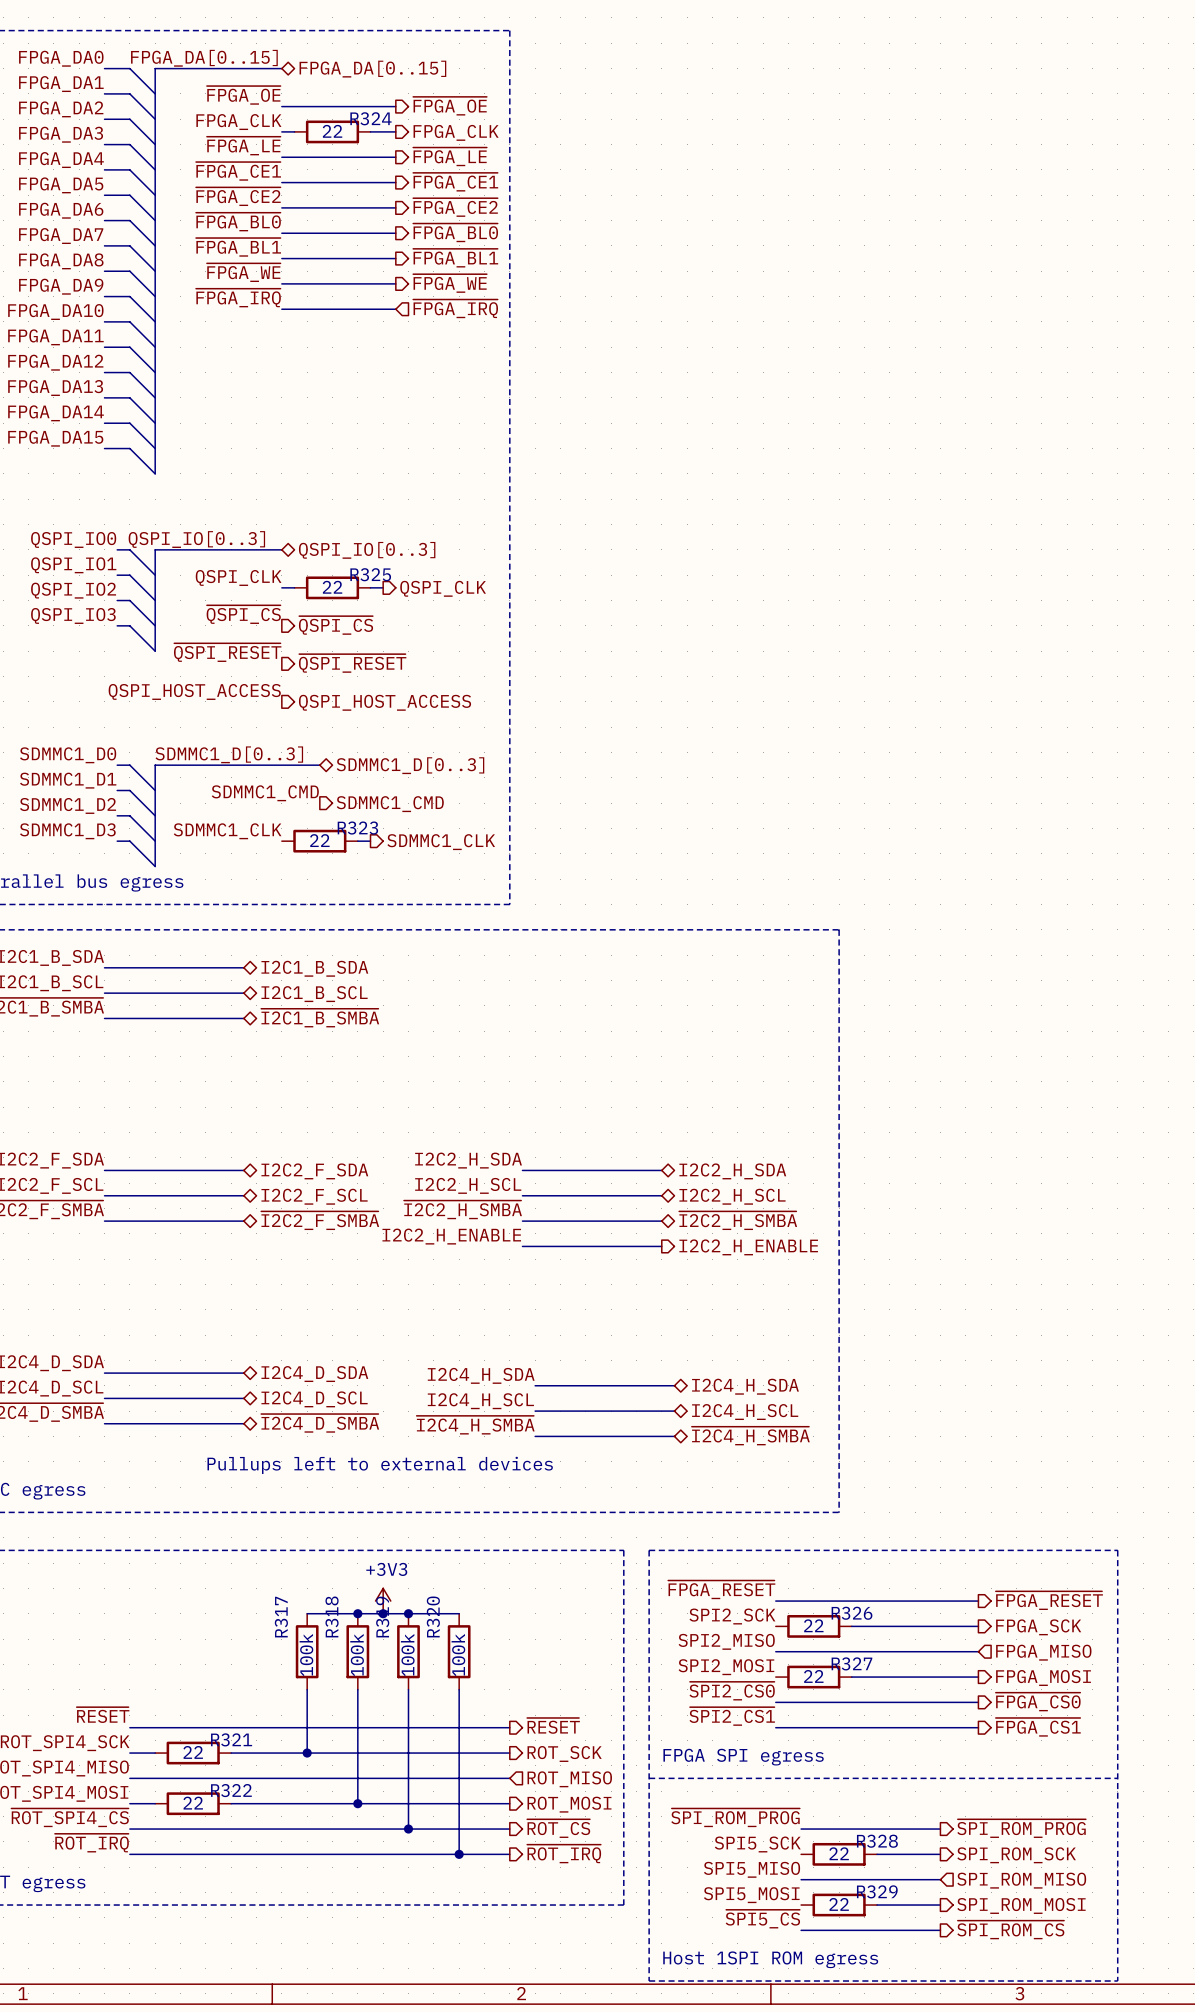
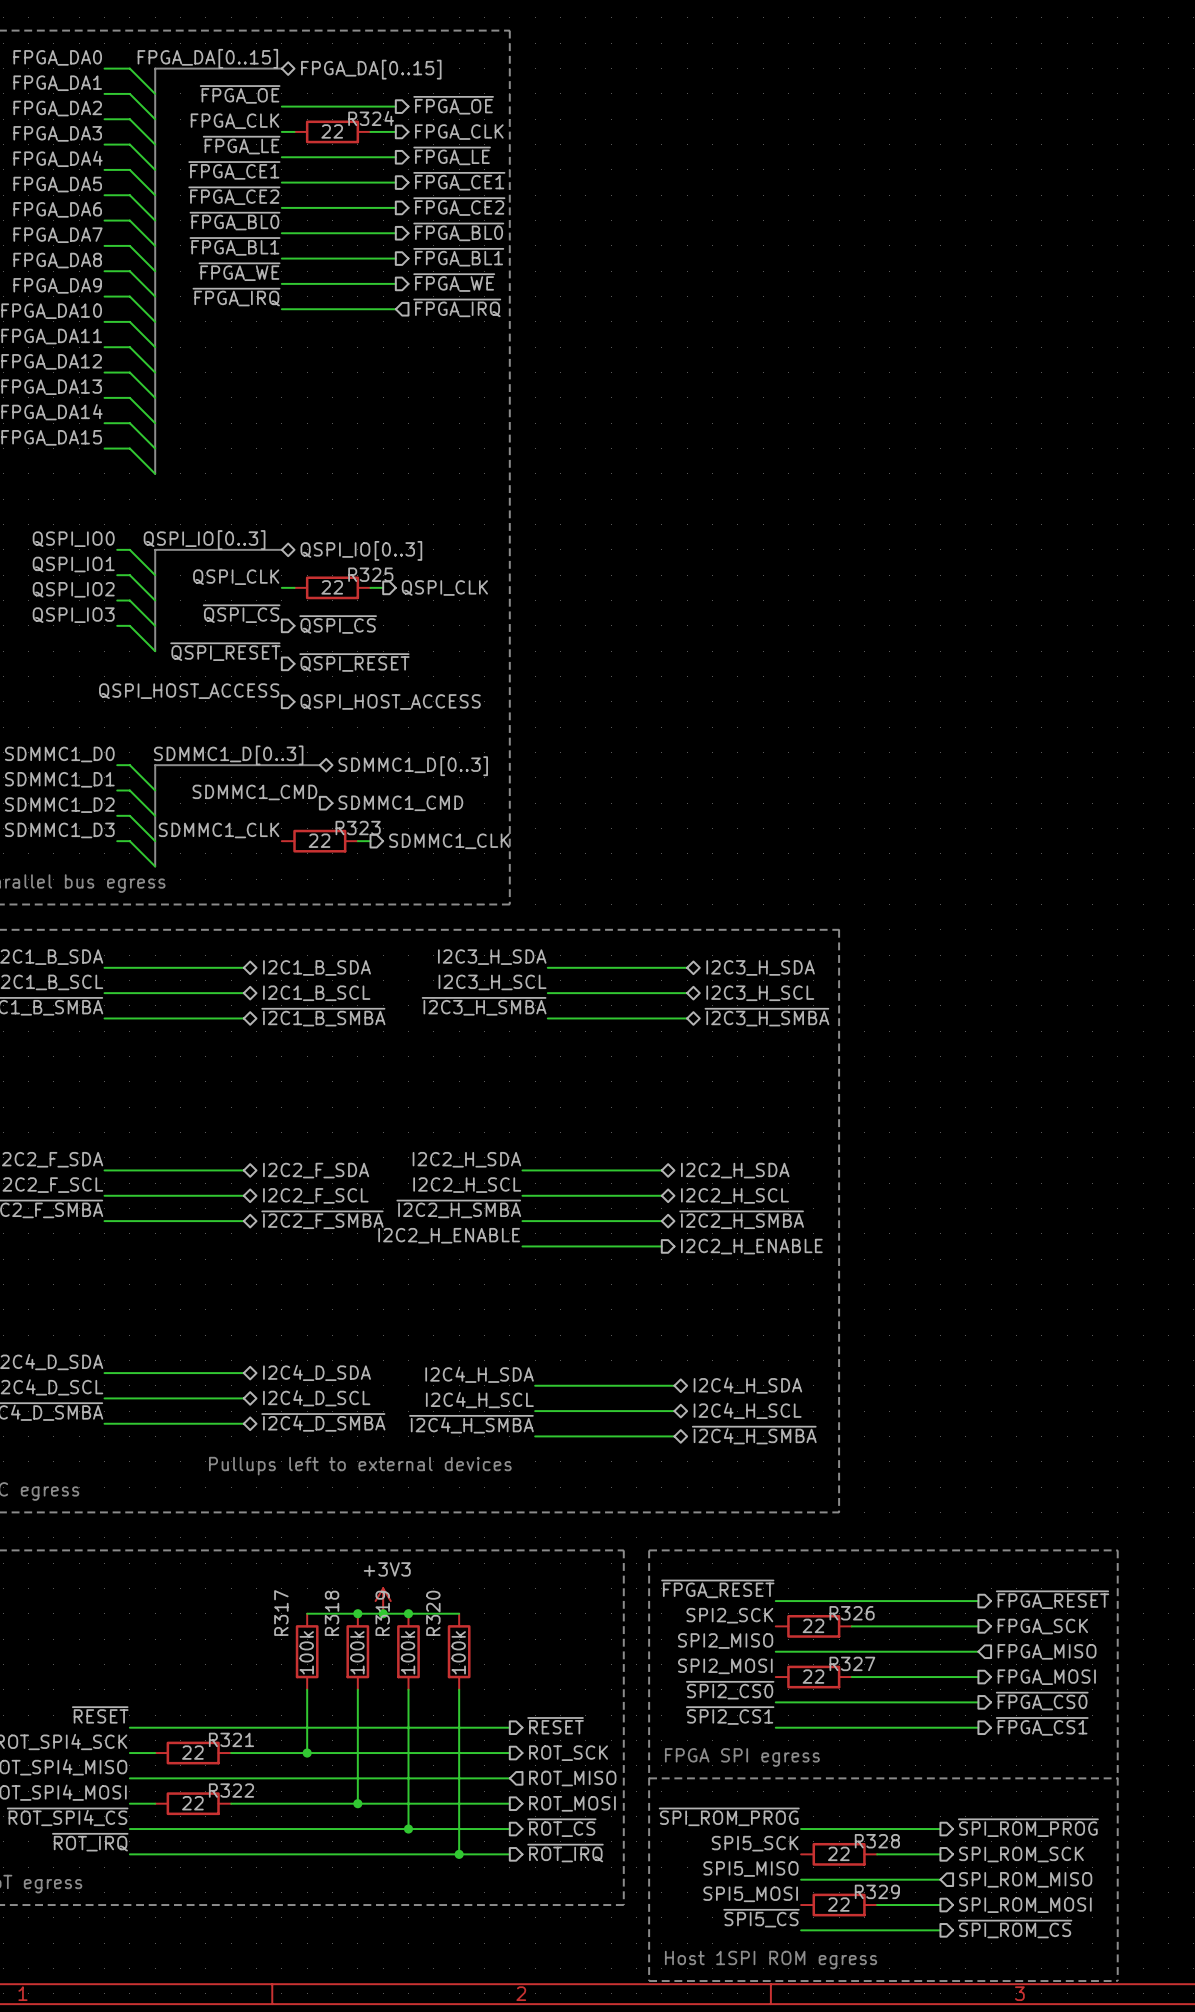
label: none -> I2C3_H_SDA (492, 957)
wire: none -> (547, 967) (687, 967)
hierarchical label: none -> I2C3_H_SDA (760, 967)
label: none -> I2C3_H_SCL (492, 982)
wire: none -> (547, 993) (687, 993)
hierarchical label: none -> I2C3_H_SCL (760, 993)
label: none -> ~{I2C3_H_SMBA} (484, 1006)
wire: none -> (547, 1018) (687, 1018)
hierarchical label: none -> ~{I2C3_H_SMBA} (766, 1017)

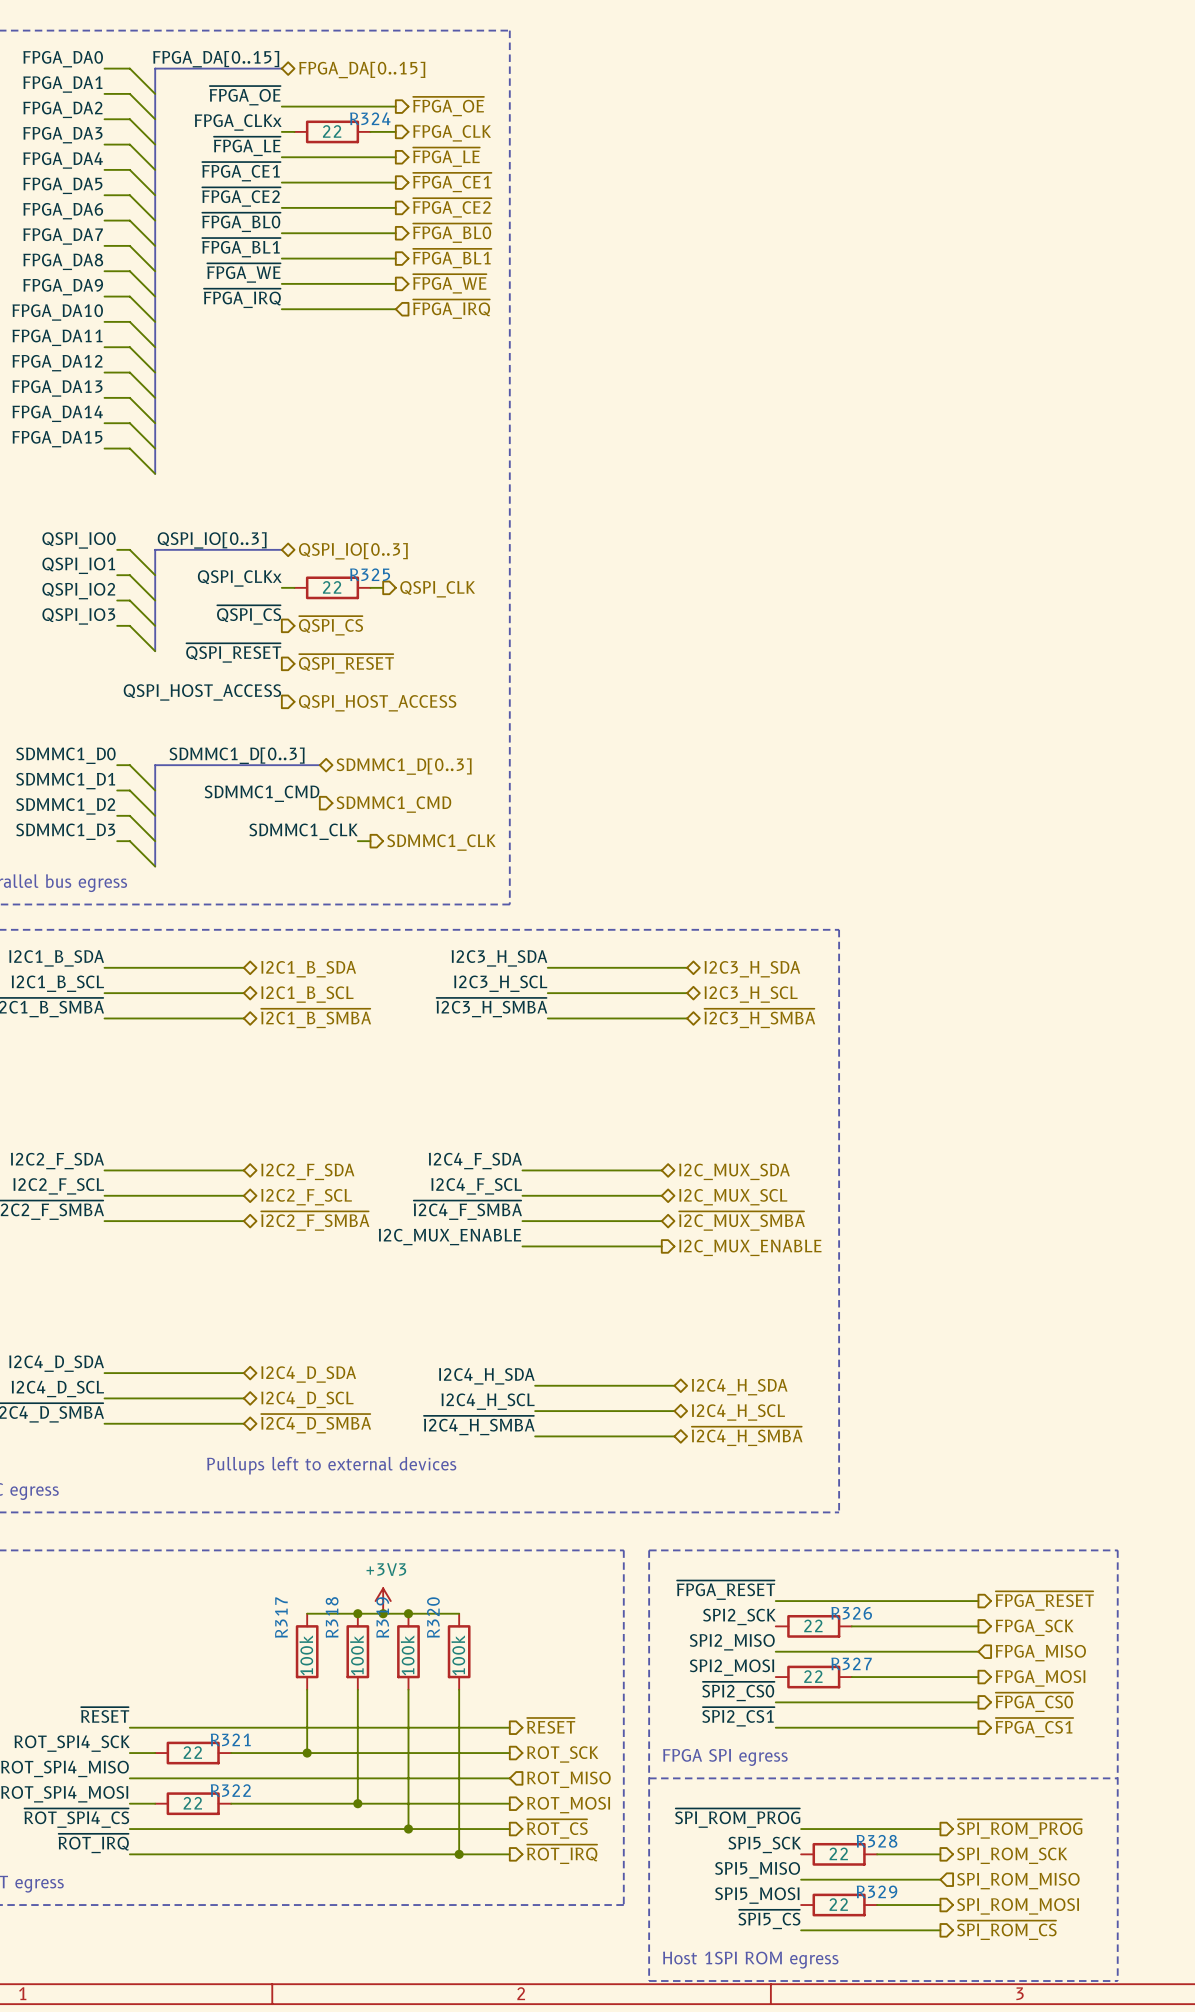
label: FPGA_CLK (235, 121) -> FPGA_CLKx (238, 122)
label: QSPI_CLK (236, 577) -> QSPI_CLKx (239, 578)
label position: SDMMC1_CLK (219, 830) -> SDMMC1_CLK (303, 831)
R323: 22 (319, 841) -> none
label: I2C2_H_SDA (466, 1159) -> I2C4_F_SDA (475, 1161)
hierarchical label: I2C2_H_SDA (735, 1170) -> I2C_MUX_SDA (734, 1171)
label: I2C2_H_SCL (467, 1185) -> I2C4_F_SCL (476, 1186)
hierarchical label: I2C2_H_SCL (734, 1195) -> I2C_MUX_SCL (733, 1197)
label: ~{I2C2_H_SMBA} (458, 1208) -> ~{I2C4_F_SMBA} (467, 1210)
hierarchical label: ~{I2C2_H_SMBA} (741, 1219) -> ~{I2C_MUX_SMBA} (741, 1221)
label: I2C2_H_ENABLE (449, 1235) -> I2C_MUX_ENABLE (450, 1237)
hierarchical label: I2C2_H_ENABLE (751, 1246) -> I2C_MUX_ENABLE (750, 1247)

